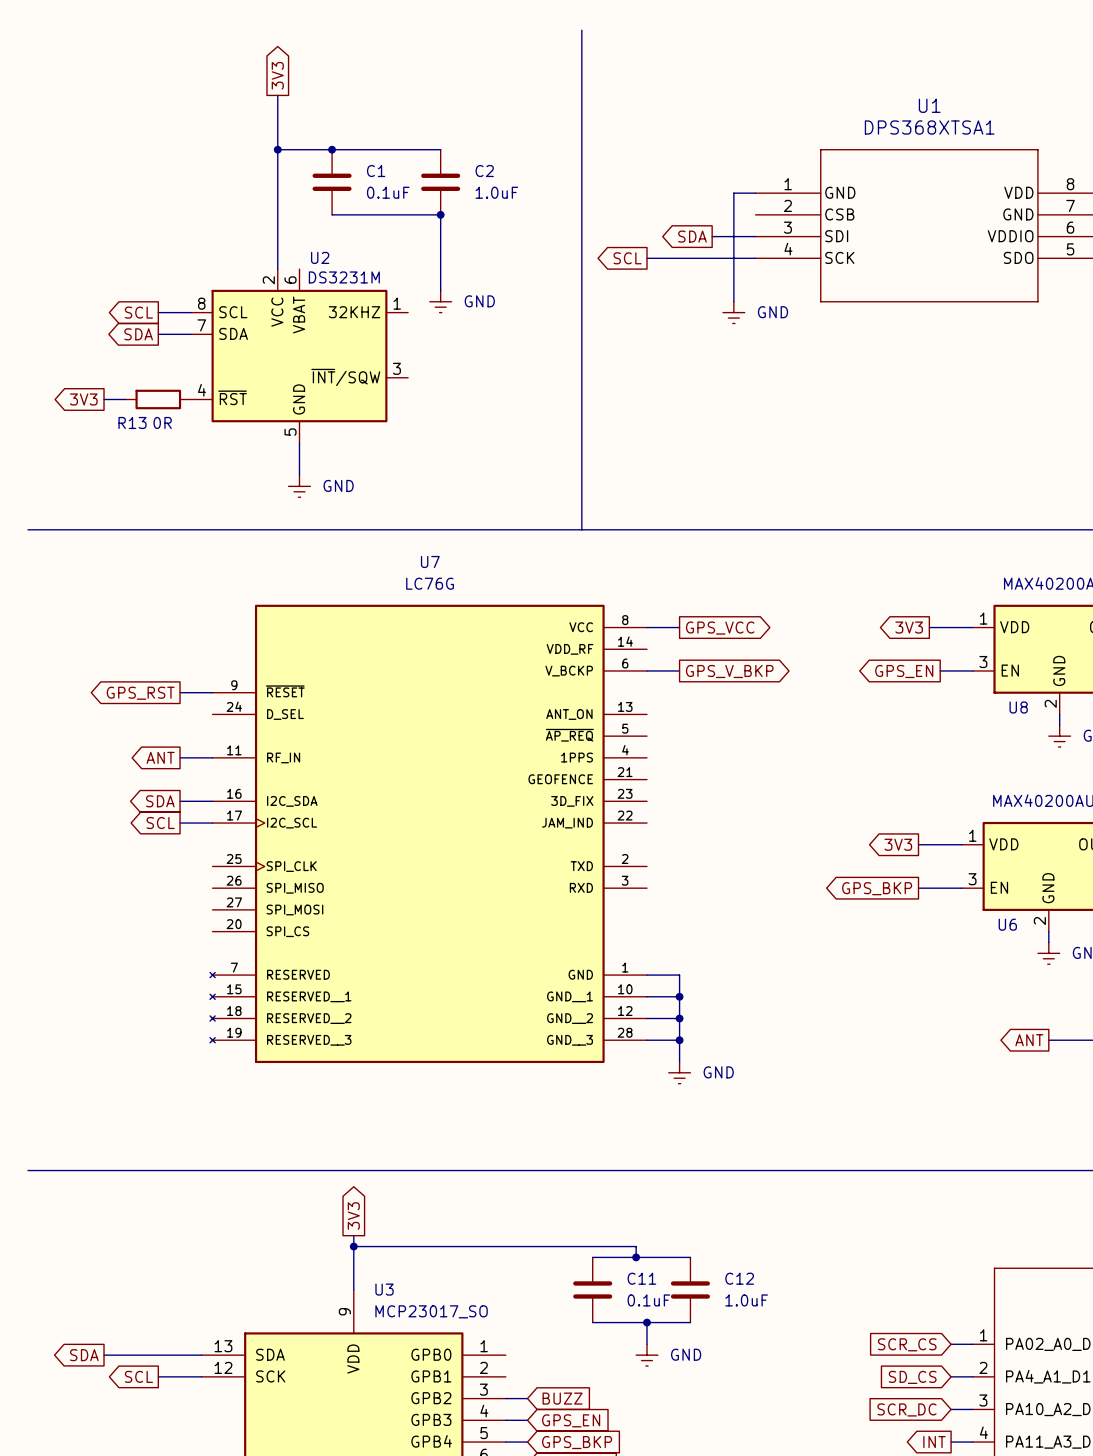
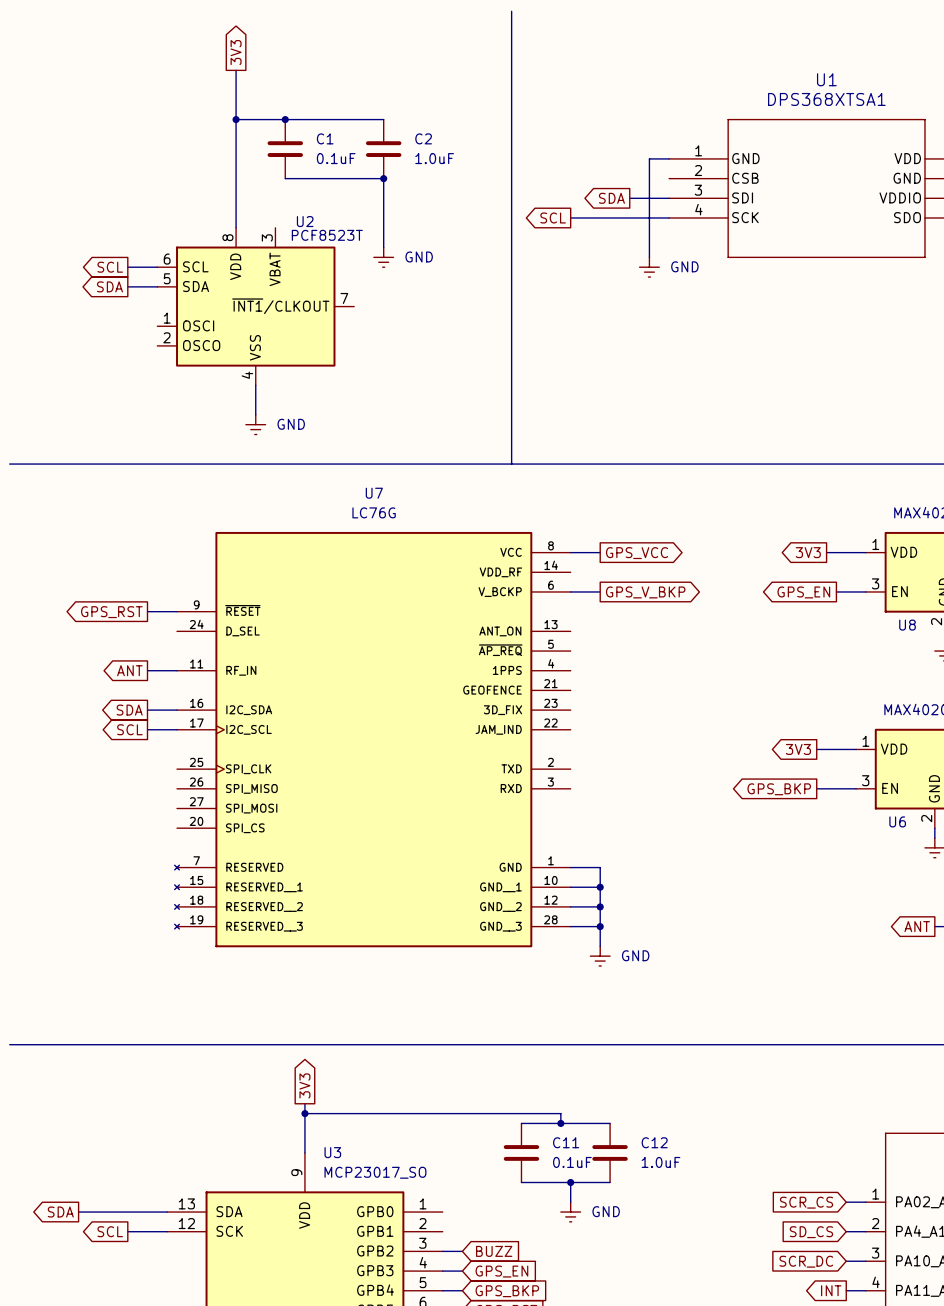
U2 name position: U2 (320, 257) -> U2 (305, 221)
U2 symbol: [190, 269, 409, 443] -> [157, 227, 355, 386]
U2 value: DS3231M (344, 277) -> PCF8523T (327, 235)
global label: 3V3 (83, 399) -> none
wire: (104, 399) (125, 399) -> none
R13: 0R (158, 399) -> none

